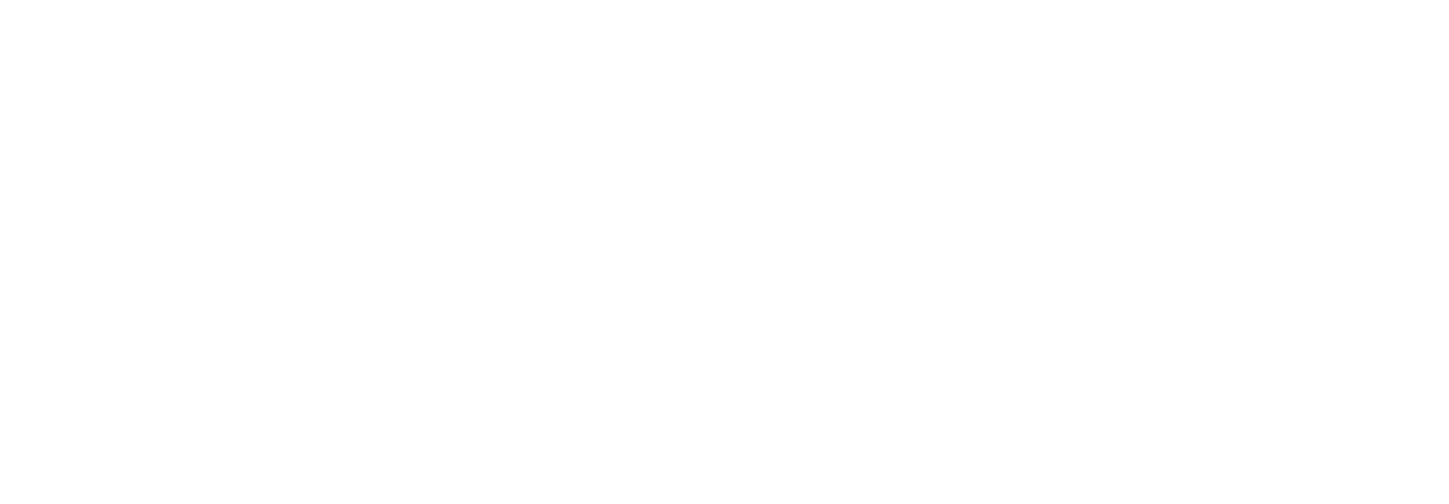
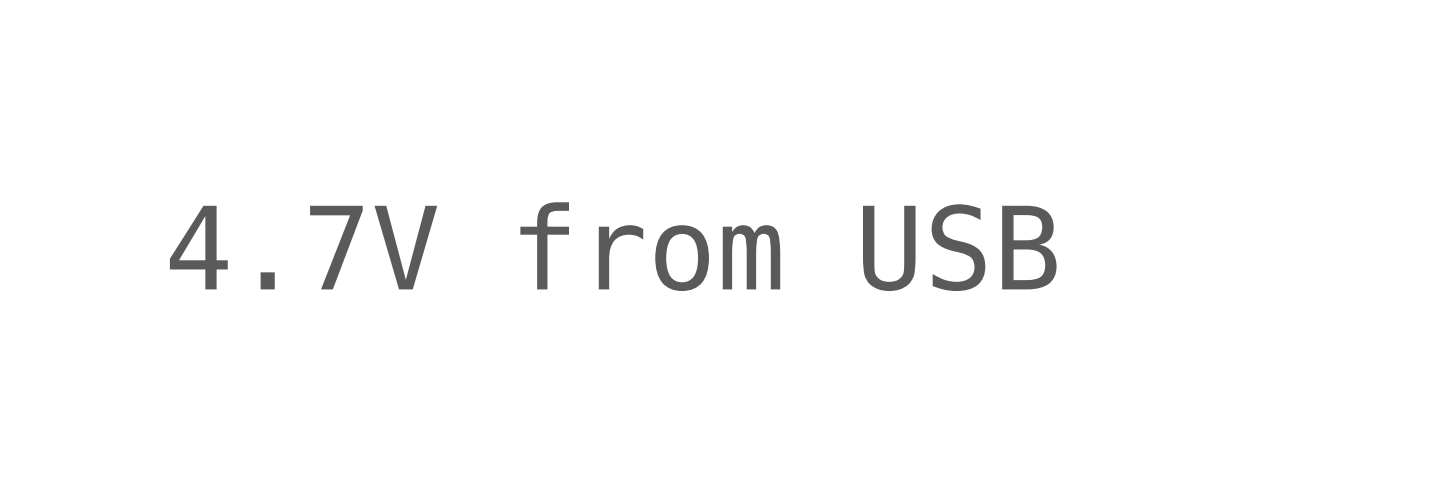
text: none -> 4.7V from USB (613, 246)

